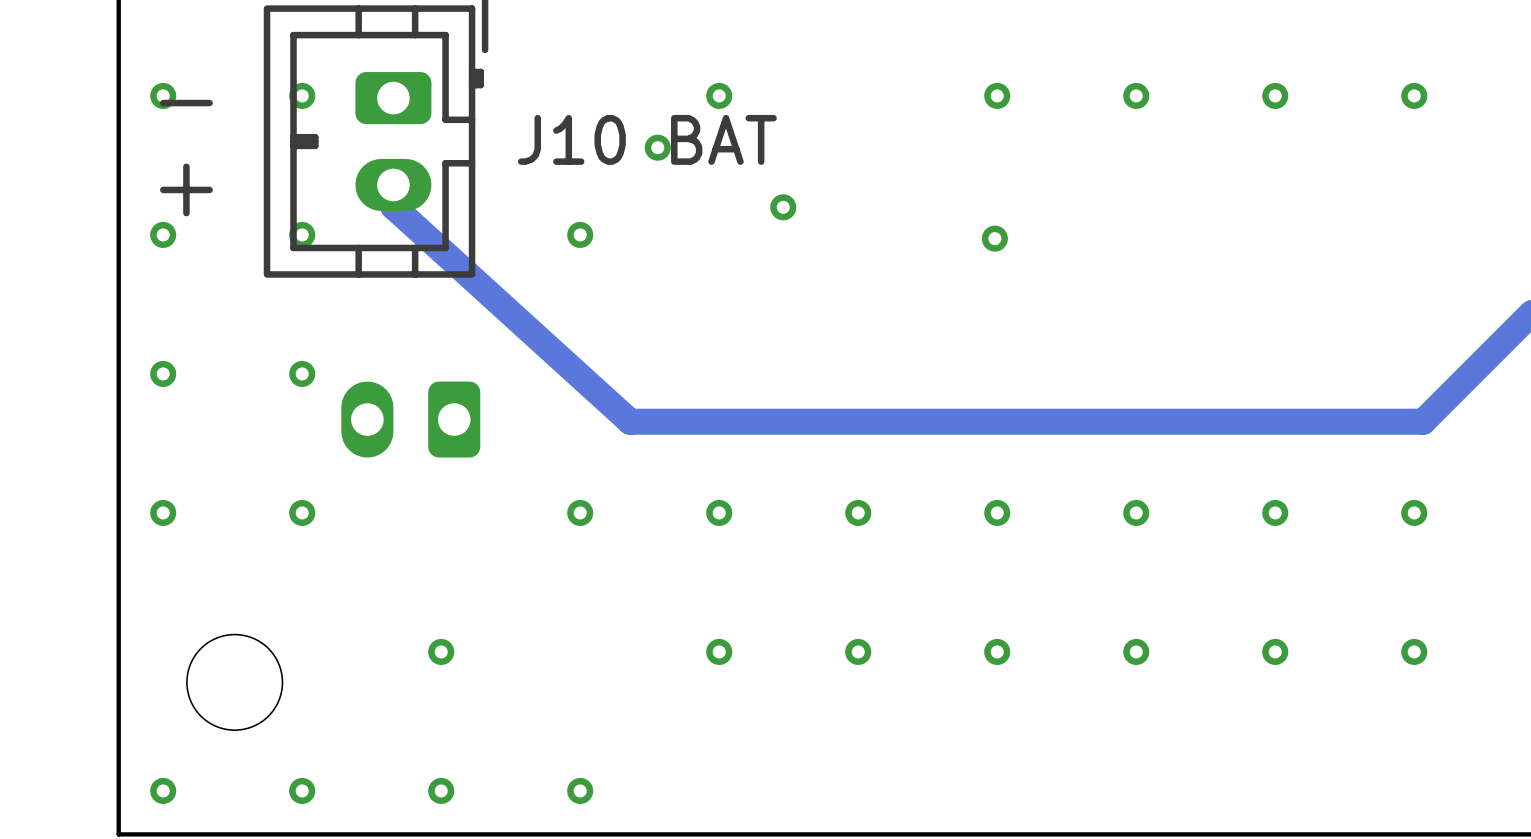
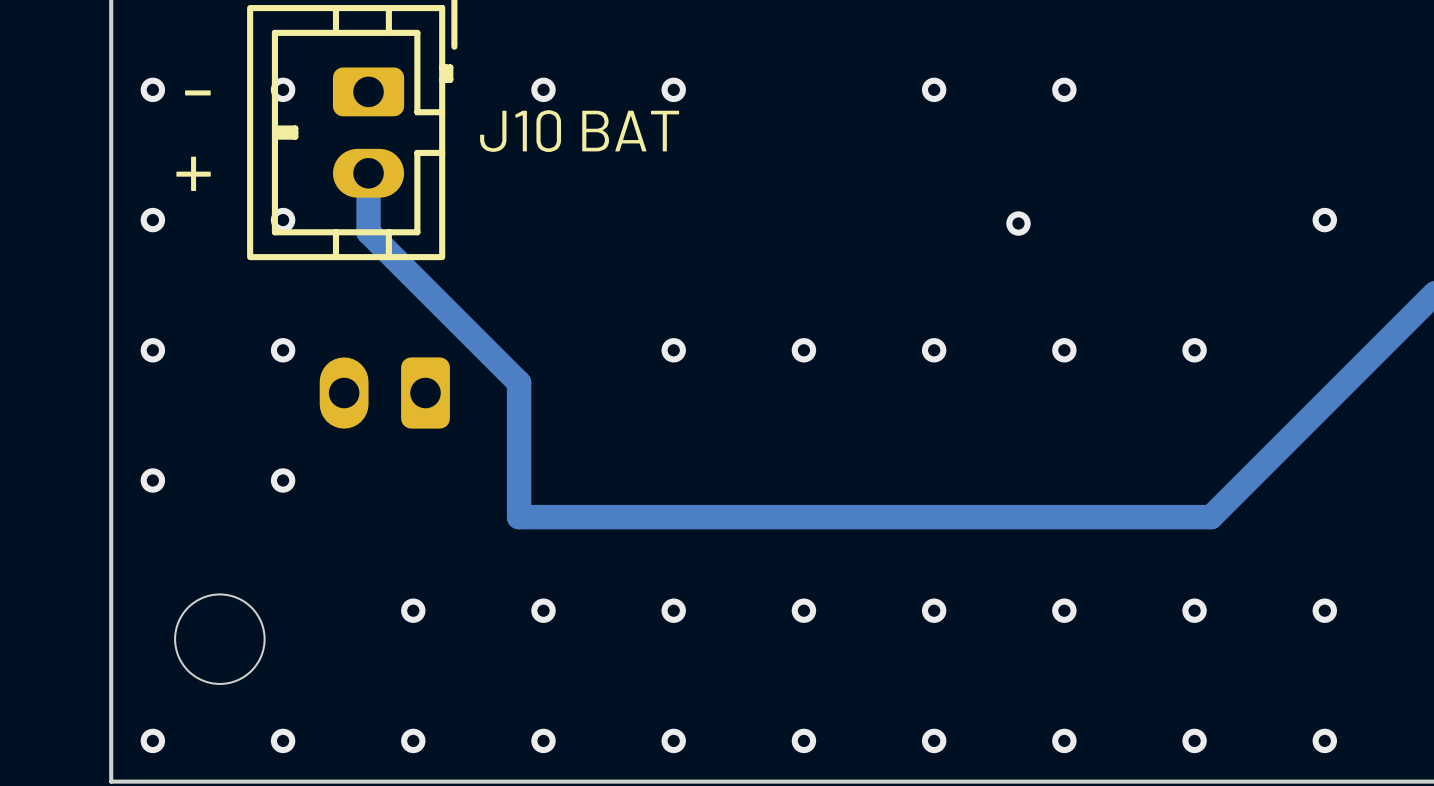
via: none -> (543, 89)
via: (1275, 95) -> none
via: (1414, 95) -> none
via: (657, 147) -> none
track: (393, 206) (630, 421) (1423, 421) -> (368, 193) (368, 232) (519, 382) (519, 517) (1211, 517) (1333, 395)
via: (783, 207) -> none
via: (580, 234) -> none
via: none -> (1324, 220)
via: (994, 238) -> none
via: none -> (1018, 223)
via: none -> (673, 350)
via: none -> (803, 350)
via: none -> (934, 350)
via: none -> (1064, 350)
via: none -> (1194, 350)
via: (580, 512) -> none
via: (719, 512) -> none
via: (858, 512) -> none
via: (997, 512) -> none
via: (1136, 512) -> none
via: (1275, 512) -> none
via: (1414, 512) -> none
via: none -> (543, 610)
via: none -> (673, 740)
via: none -> (803, 740)
via: none -> (934, 740)
via: none -> (1064, 740)
via: none -> (1194, 740)
via: none -> (1324, 740)

